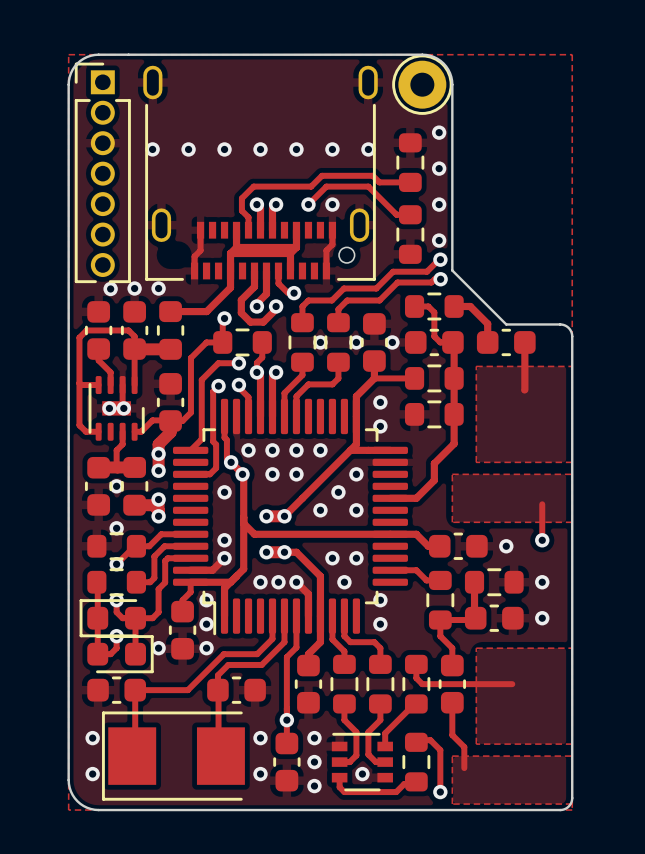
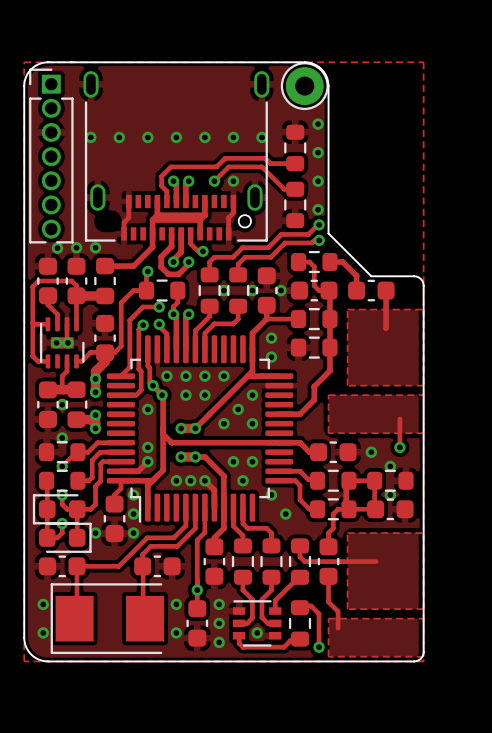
via: none -> (390, 466)
track: none -> (279, 480) (295, 480) (300, 485) (300, 499) (309, 509) (317, 509)
part: none -> (333, 480)
part: (494, 582) -> none
part: none -> (390, 480)
via: (542, 582) -> none
part: (440, 600) -> none
via: none -> (390, 495)
part: none -> (333, 509)
track: (475, 618) (473, 620) (440, 620) (440, 636) (452, 648) -> (348, 480) (374, 480) (375, 509) (338, 509) (333, 514) (333, 528) (328, 533)
part position: (494, 618) -> (390, 509)
via: (542, 618) -> none
via position: (380, 624) -> (285, 514)

